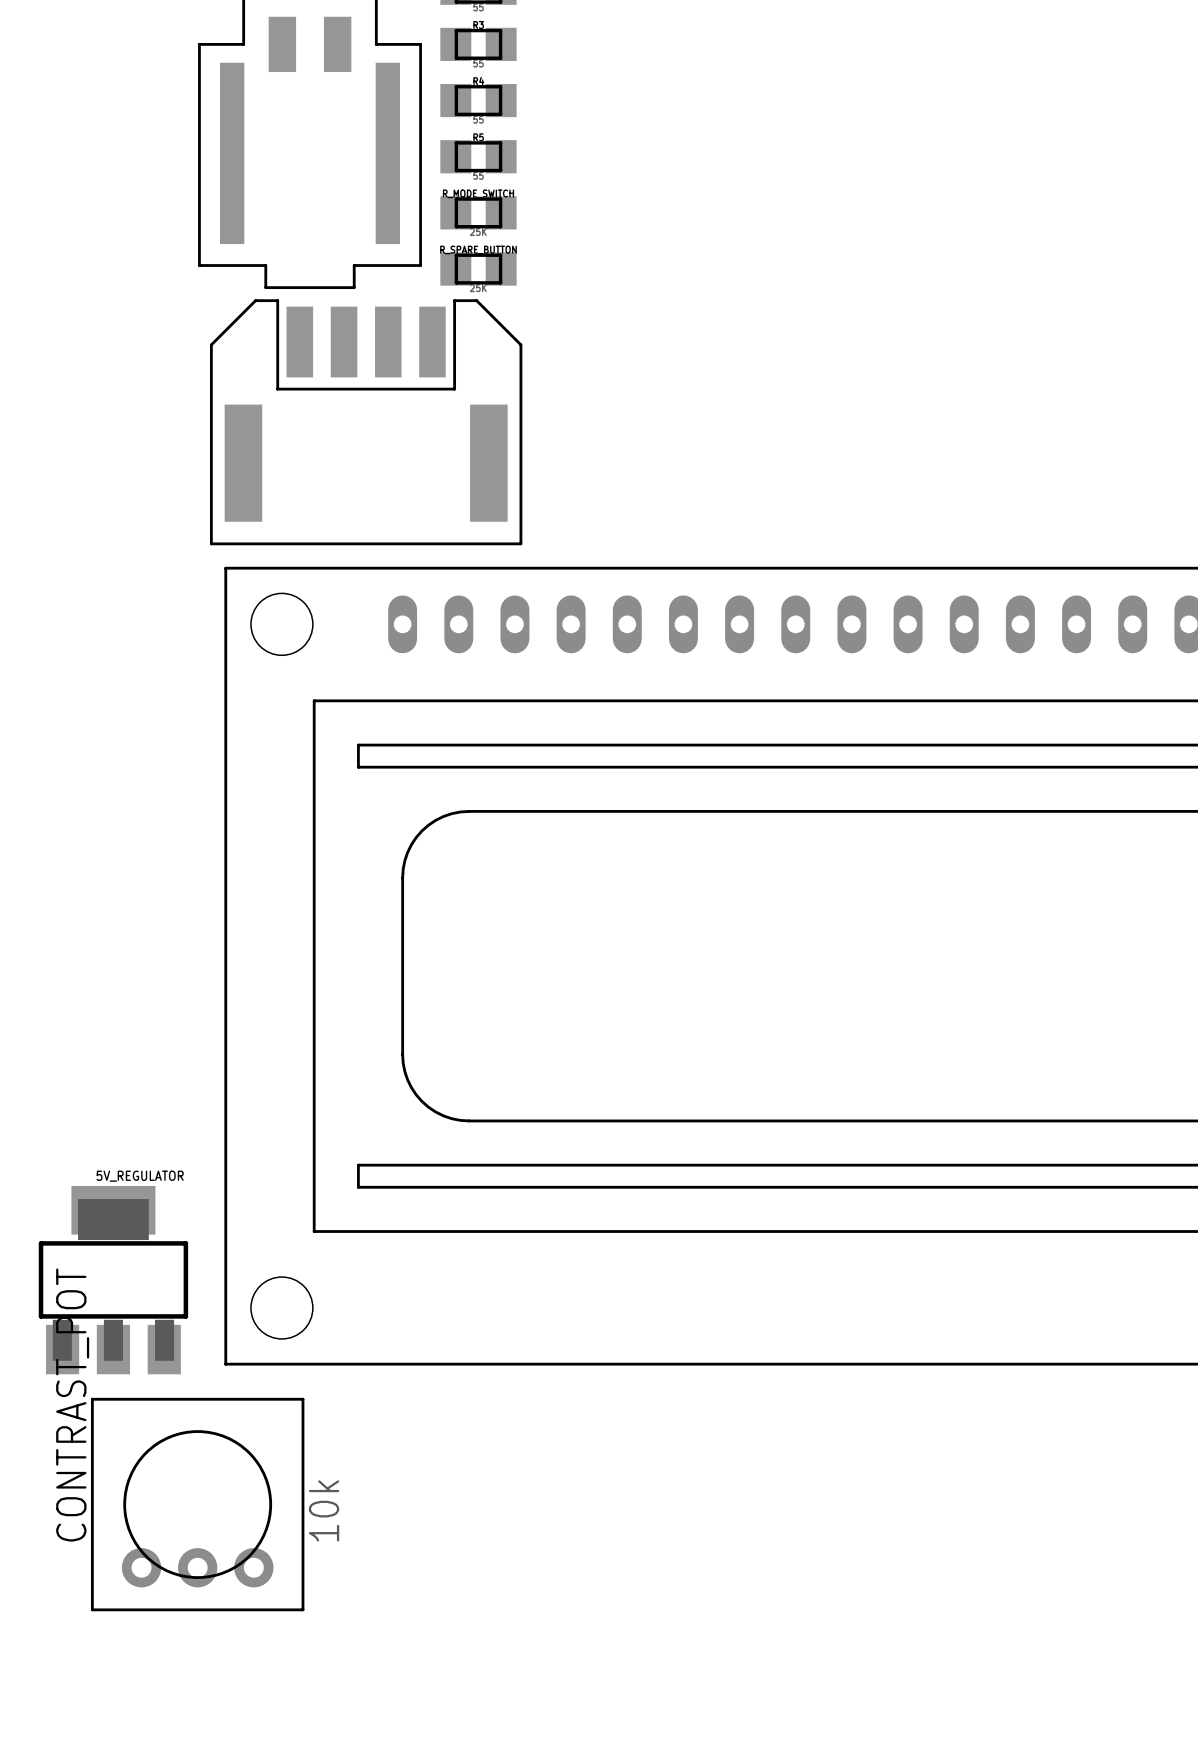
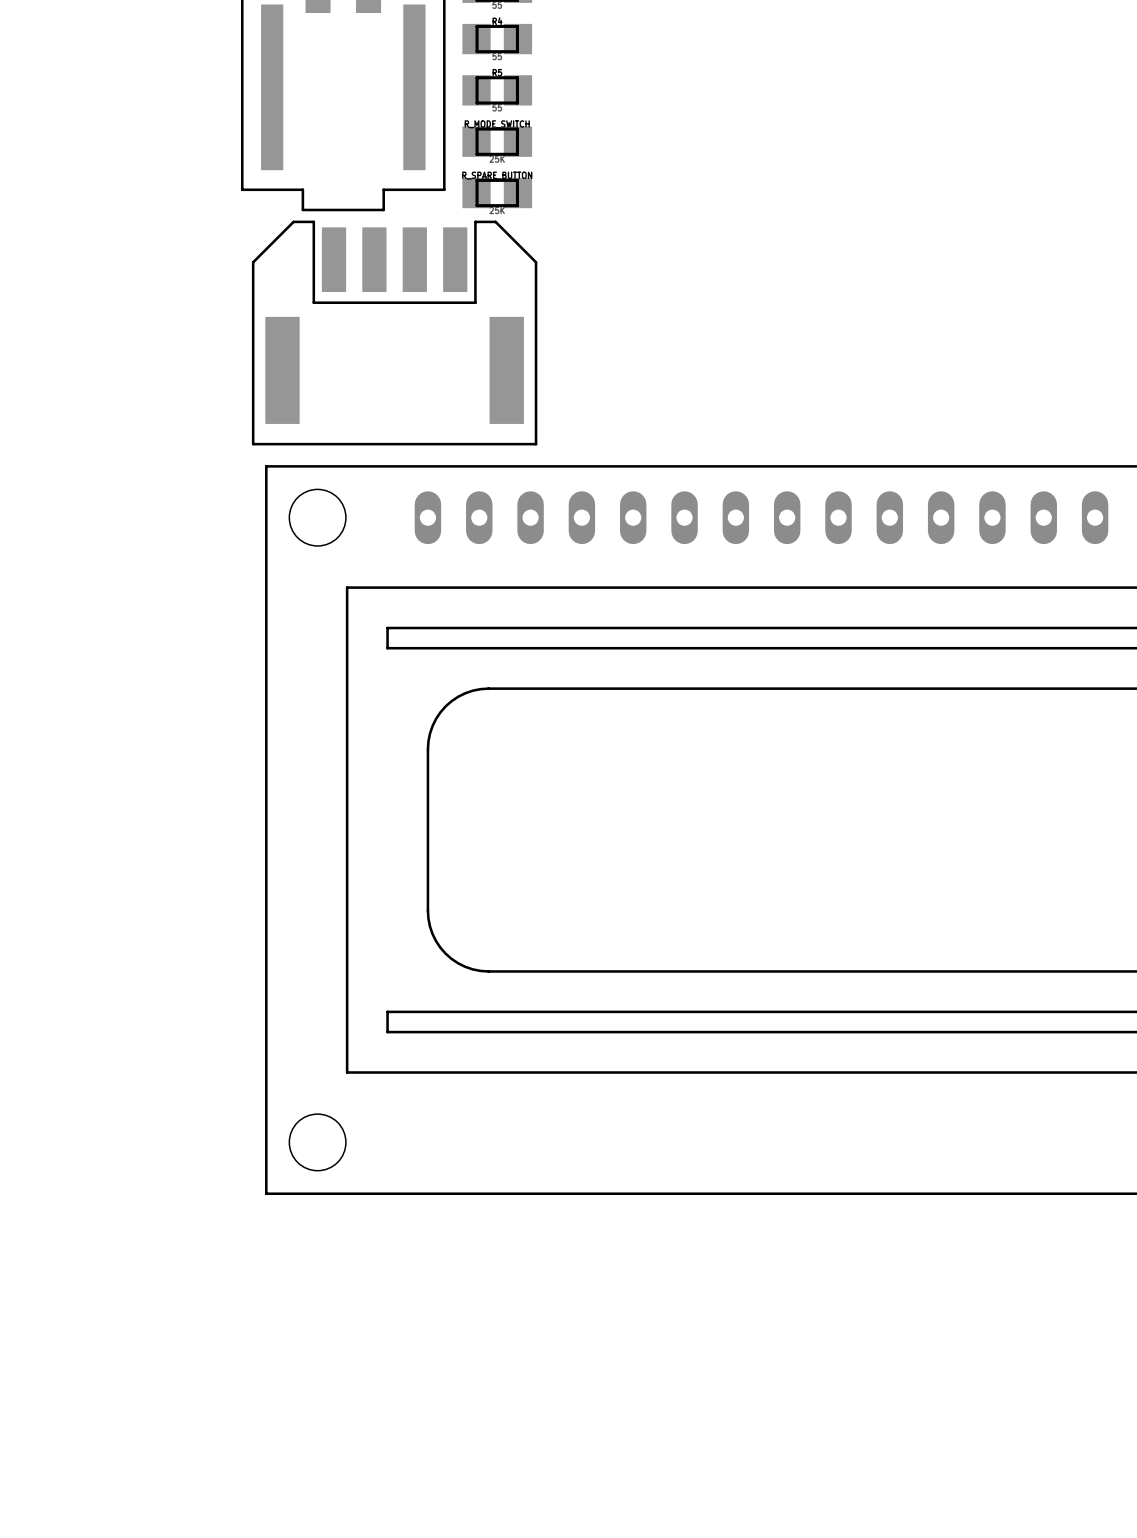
5V_REGULATOR: (113, 1280) -> none
CONTRAST_POT: 10k (197, 1504) -> none

